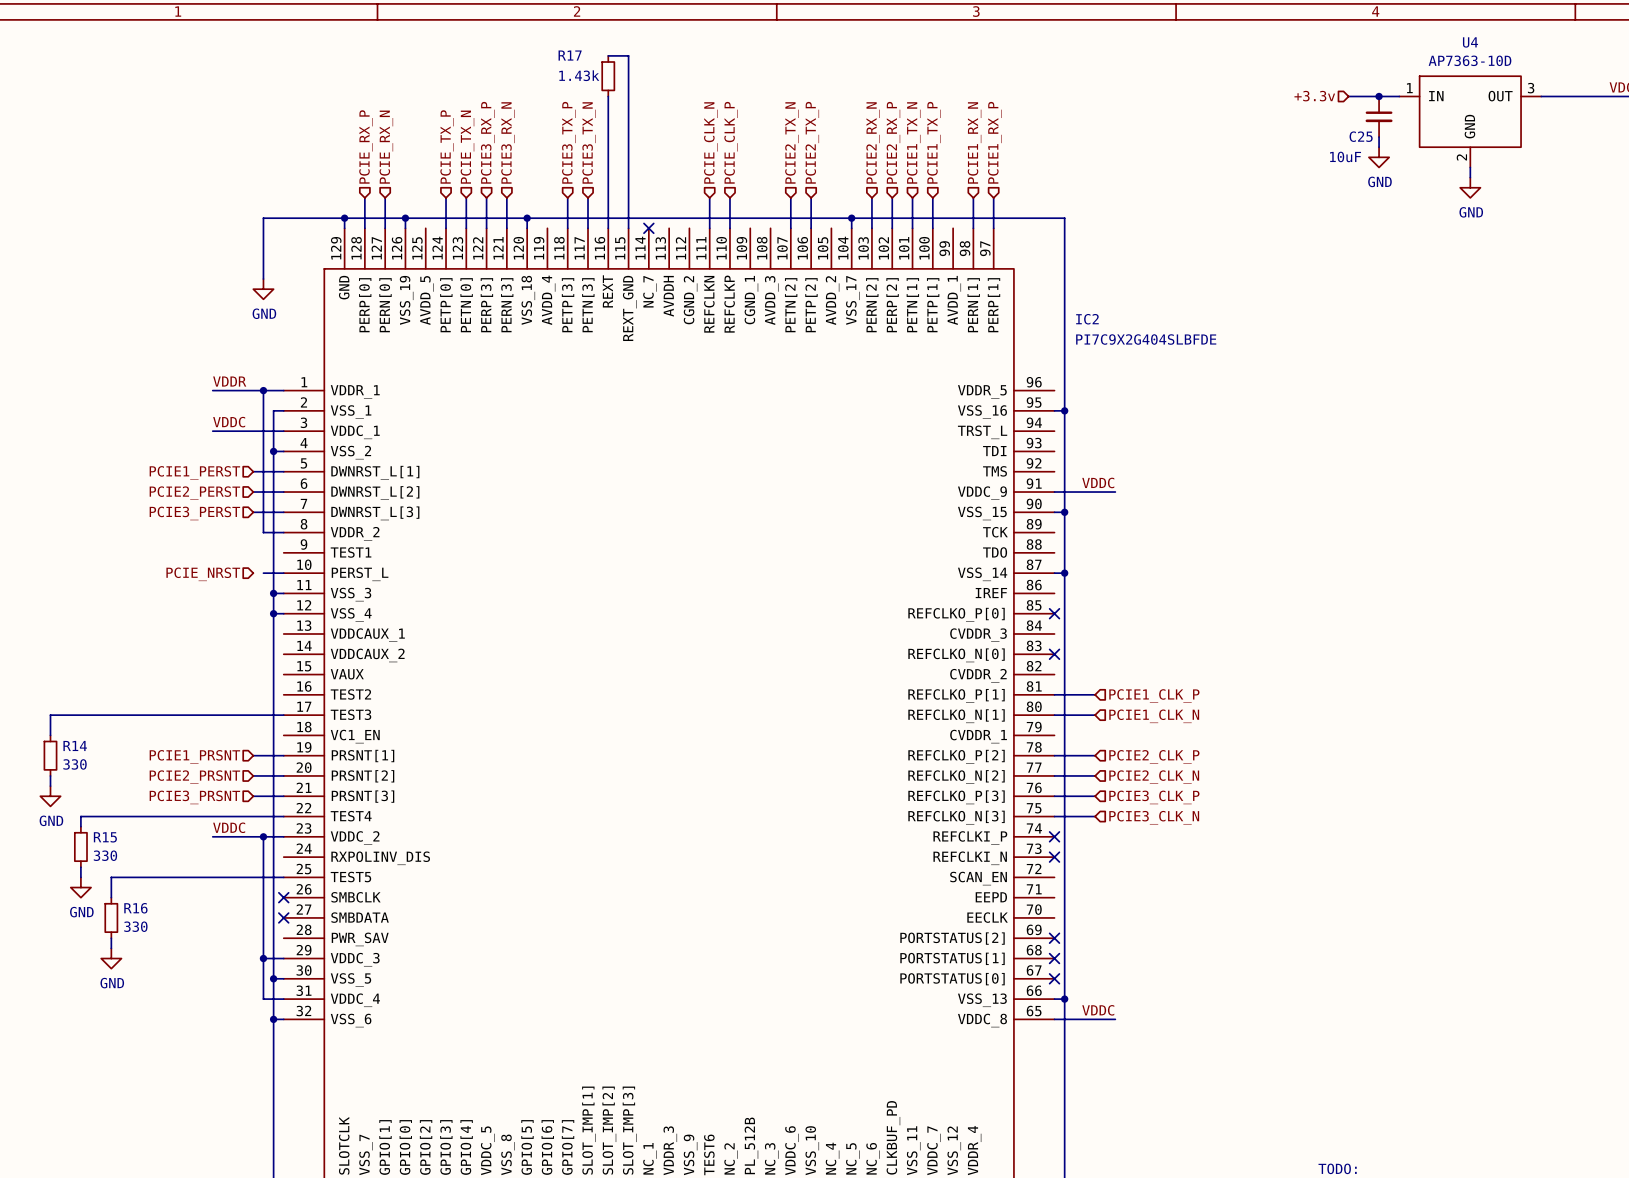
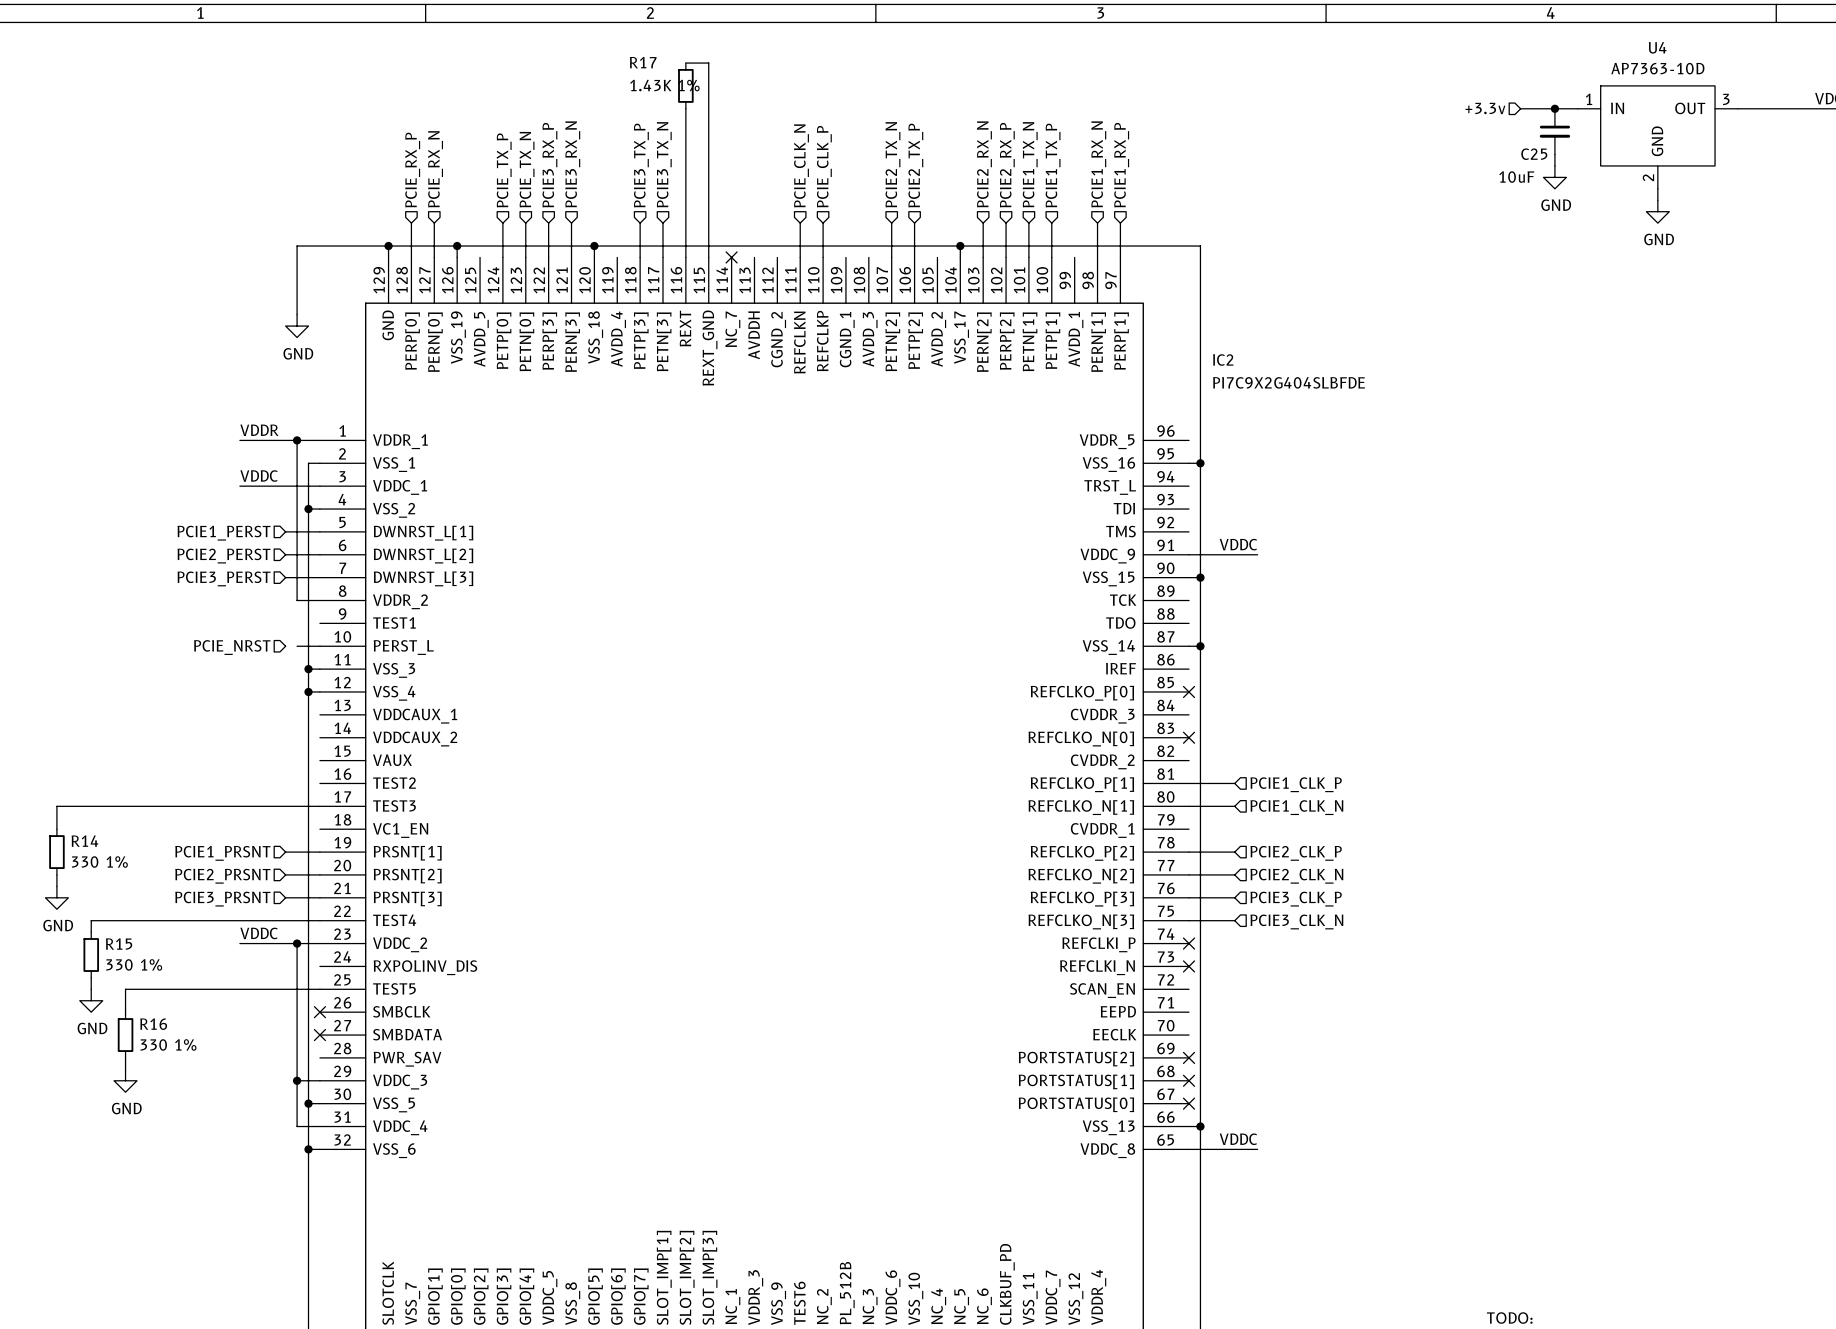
R17 value: 1.43k (579, 75) -> 1.43K 1% (664, 85)
R14 value: 330 (75, 764) -> 330 1% (99, 862)
R15 value: 330 (105, 855) -> 330 1% (134, 964)
R16 value: 330 (135, 926) -> 330 1% (168, 1044)

